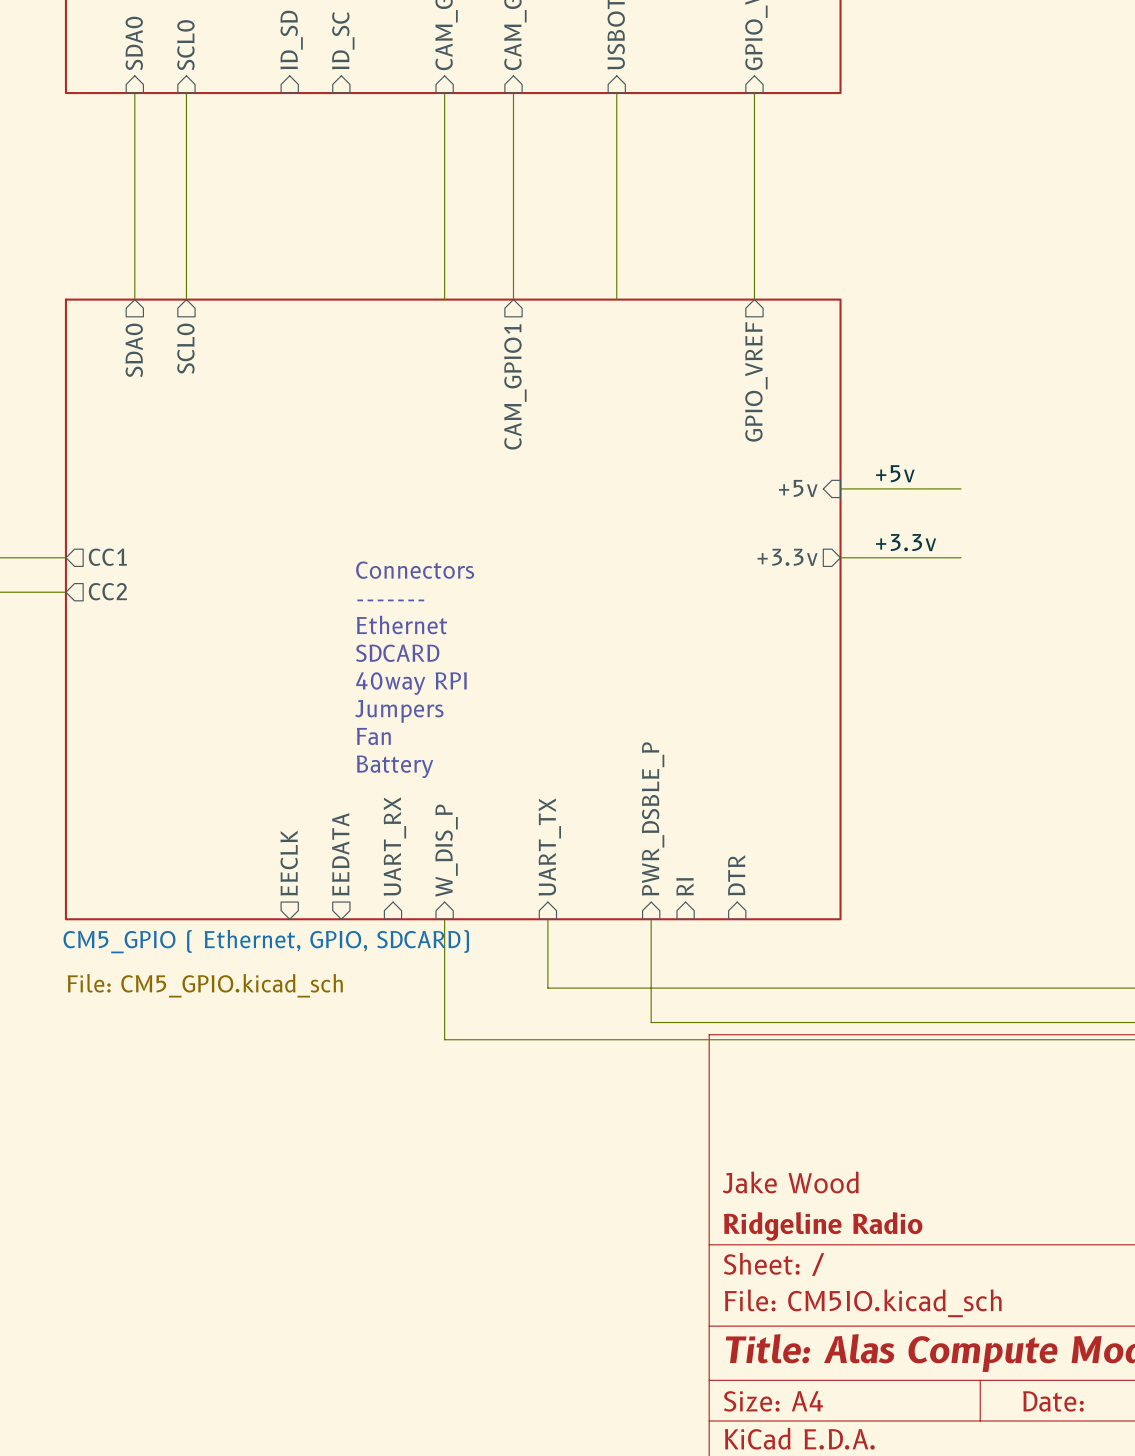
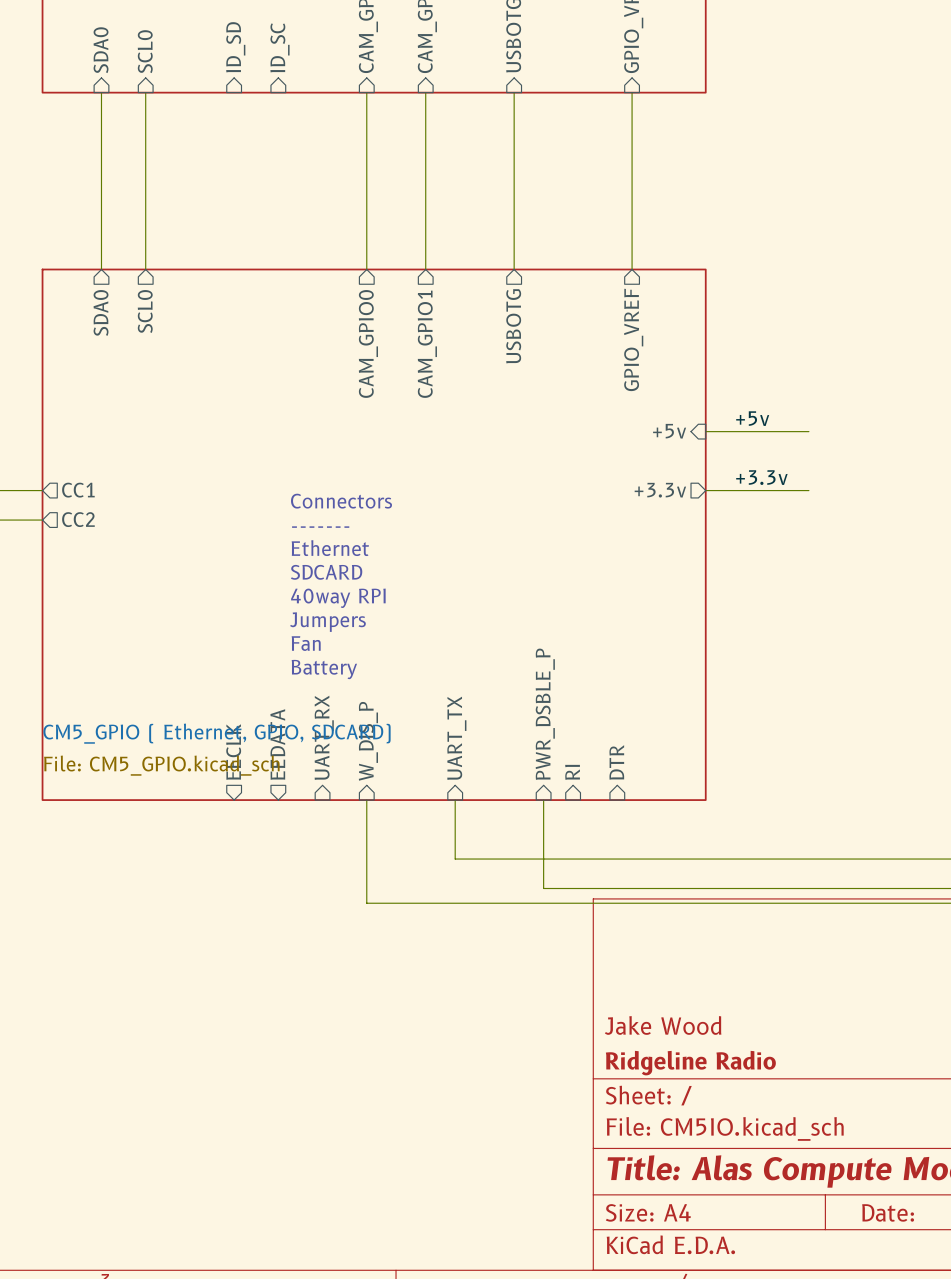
sheet pin: none -> USBOTG (513, 326)
sheet pin: none -> CAM_GPIO0 (368, 343)
sheet CM5_GPIO ( Ethernet, GPIO, SDCARD) name position: CM5_GPIO ( Ethernet, GPIO, SDCARD) (266, 941) -> CM5_GPIO ( Ethernet, GPIO, SDCARD) (217, 733)
sheet CM5_GPIO ( Ethernet, GPIO, SDCARD) value position: File: CM5_GPIO.kicad_sch (205, 985) -> File: CM5_GPIO.kicad_sch (161, 765)

